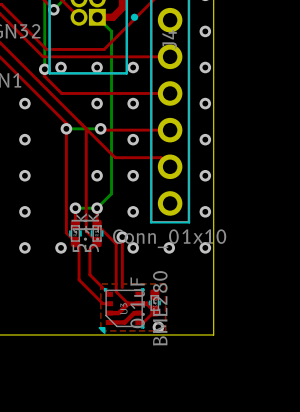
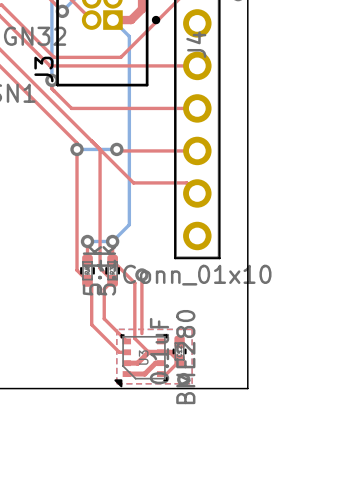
via: (205, 31) -> none
J3 name: none -> J3 (43, 69)
via: (61, 67) -> none
via: (97, 67) -> none
via: (133, 67) -> none
via: (205, 67) -> none
via: (24, 103) -> none
via: (97, 103) -> none
via: (133, 103) -> none
via: (205, 103) -> none
via: (24, 139) -> none
via: (133, 139) -> none
via: (205, 139) -> none
via: (24, 175) -> none
via: (97, 175) -> none
via: (133, 175) -> none
via: (205, 175) -> none
via: (24, 211) -> none
via: (133, 211) -> none
via: (205, 211) -> none
via: (24, 247) -> none
via: (61, 247) -> none
via: (133, 247) -> none
via: (169, 247) -> none
via: (205, 247) -> none

